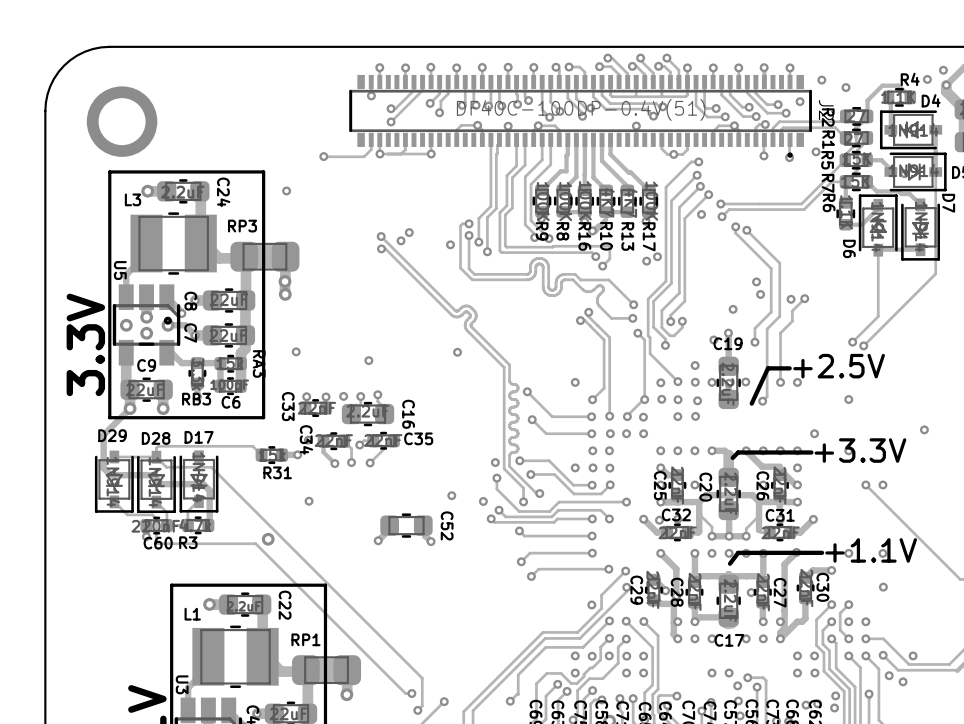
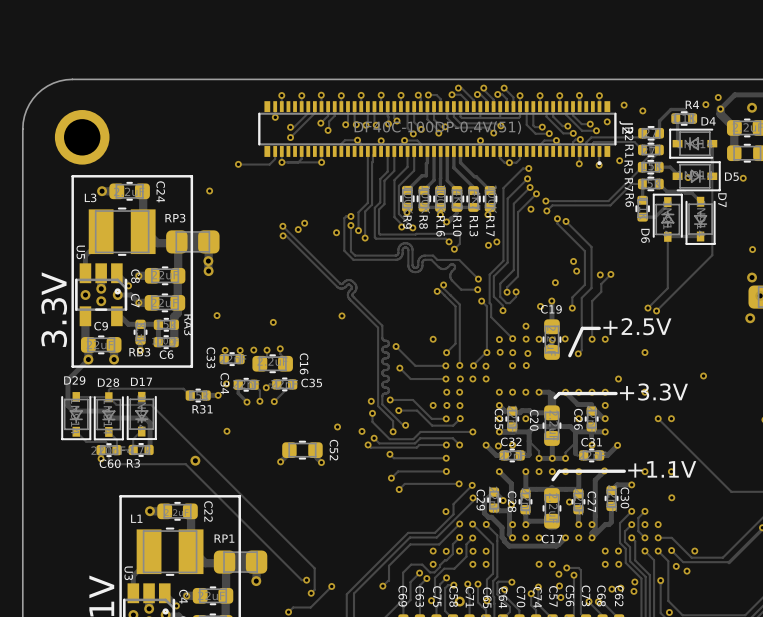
track: none -> (512, 411) (514, 412) (519, 412) (521, 410) (551, 412)
track: none -> (494, 492) (484, 501) (484, 513) (488, 517) (491, 517) (502, 527) (502, 537) (509, 546) (556, 546) (565, 537)

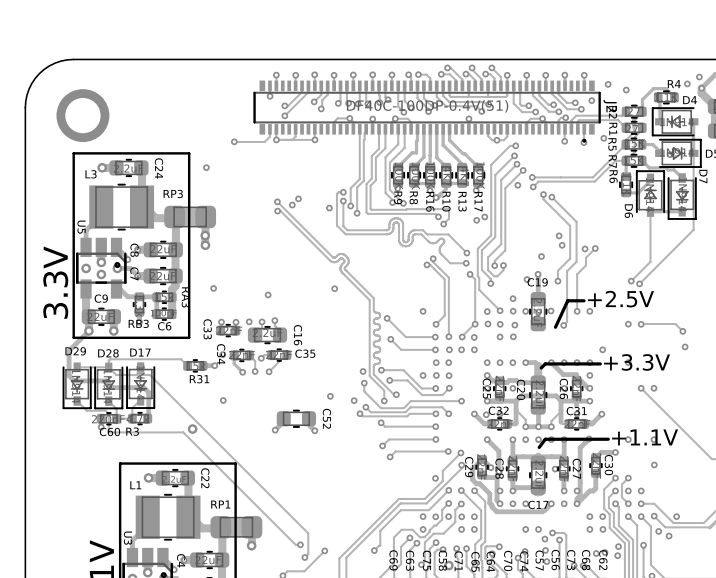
track: none -> (641, 324) (675, 324) (682, 331)
via: none -> (641, 324)
via: none -> (682, 331)

